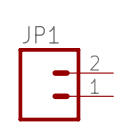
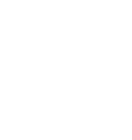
JP1: (65, 84) -> none

